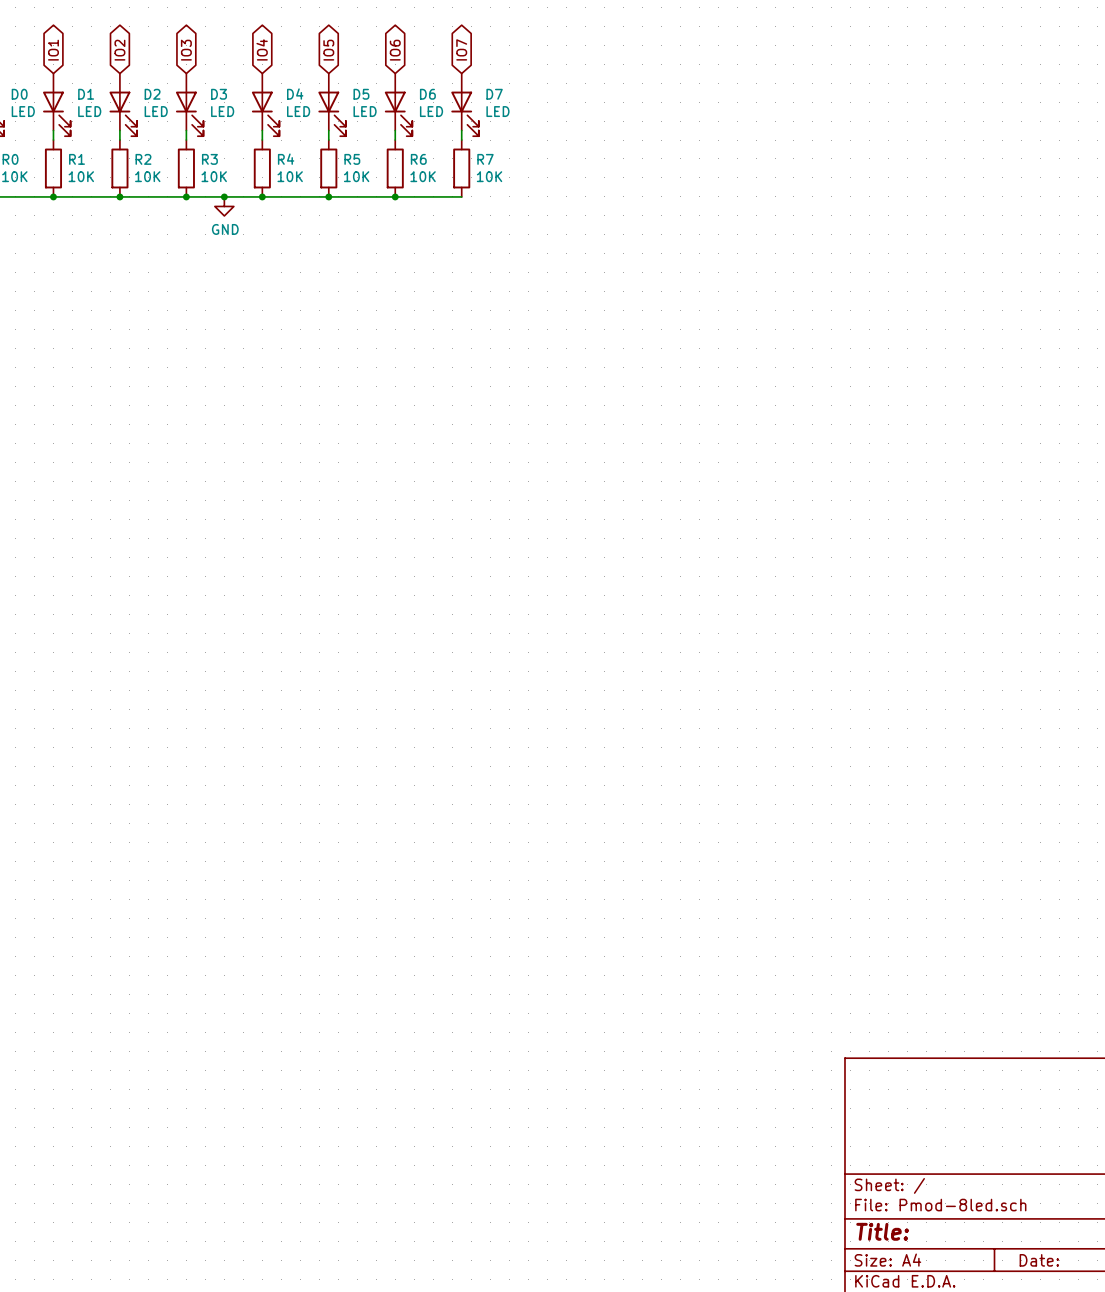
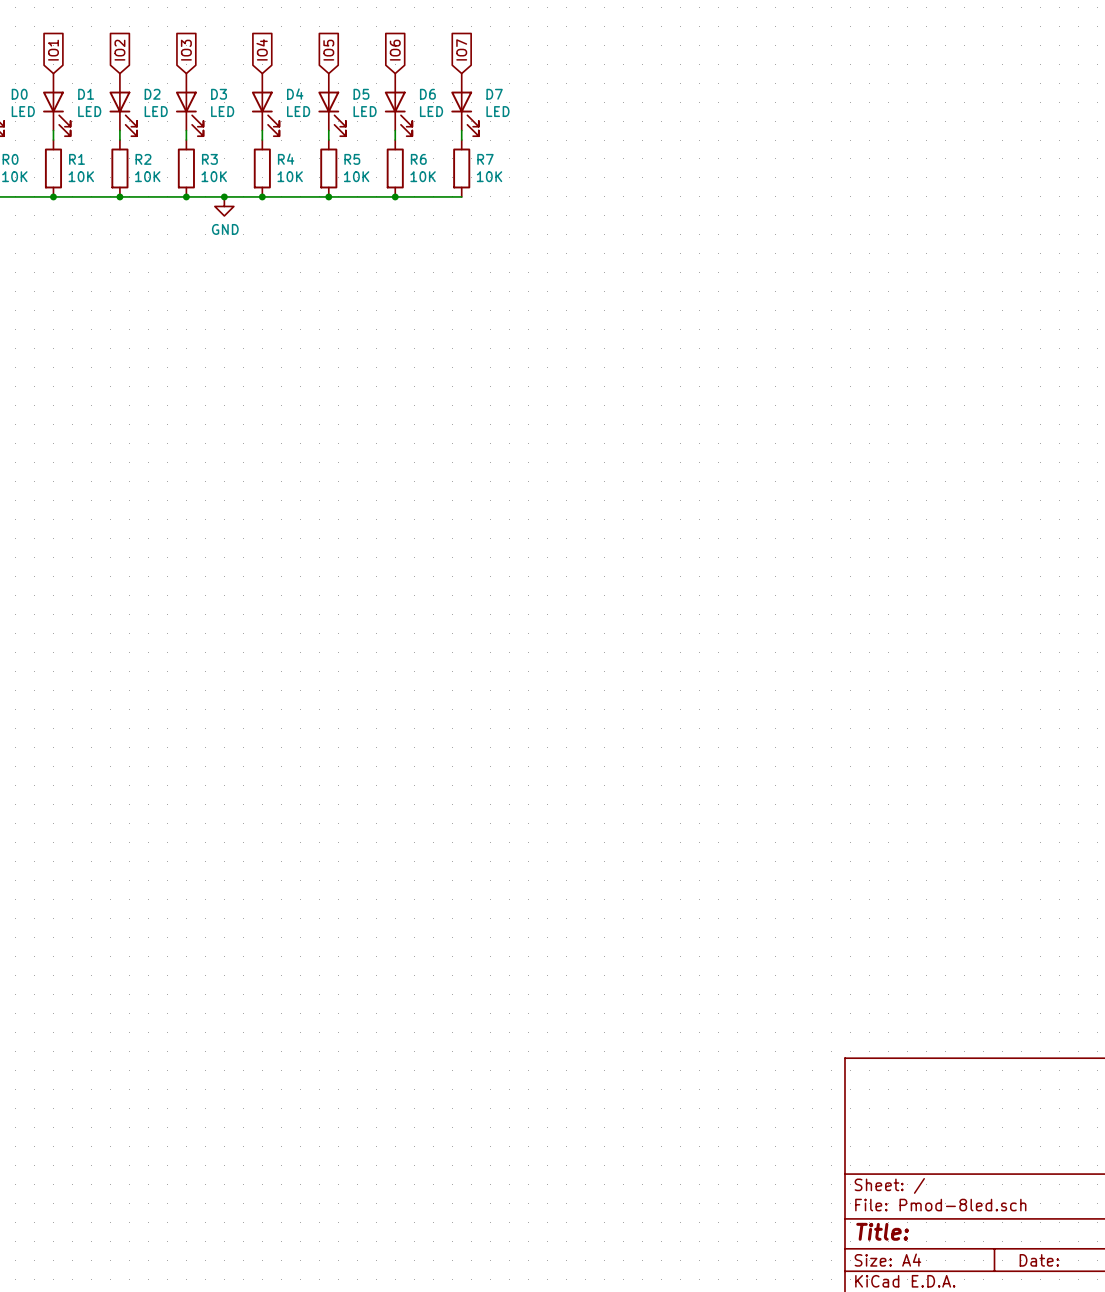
global label shape: bidirectional (262, 49) -> input (262, 49)
global label shape: bidirectional (461, 49) -> input (461, 49)
global label shape: bidirectional (53, 50) -> input (53, 50)
global label shape: bidirectional (119, 50) -> input (119, 50)
global label shape: bidirectional (186, 50) -> input (186, 50)
global label shape: bidirectional (328, 50) -> input (328, 50)
global label shape: bidirectional (395, 50) -> input (395, 50)

